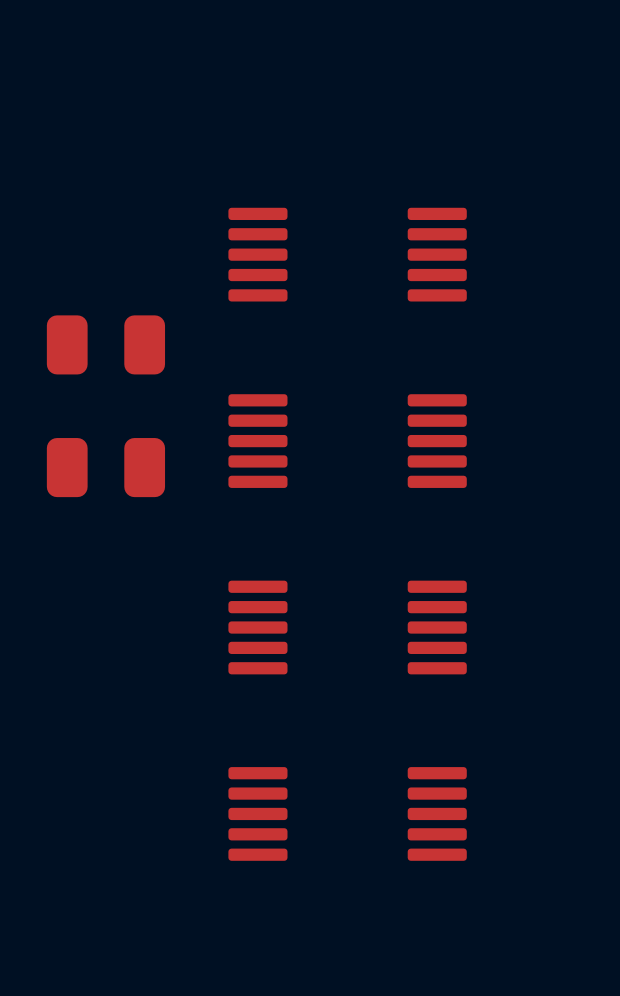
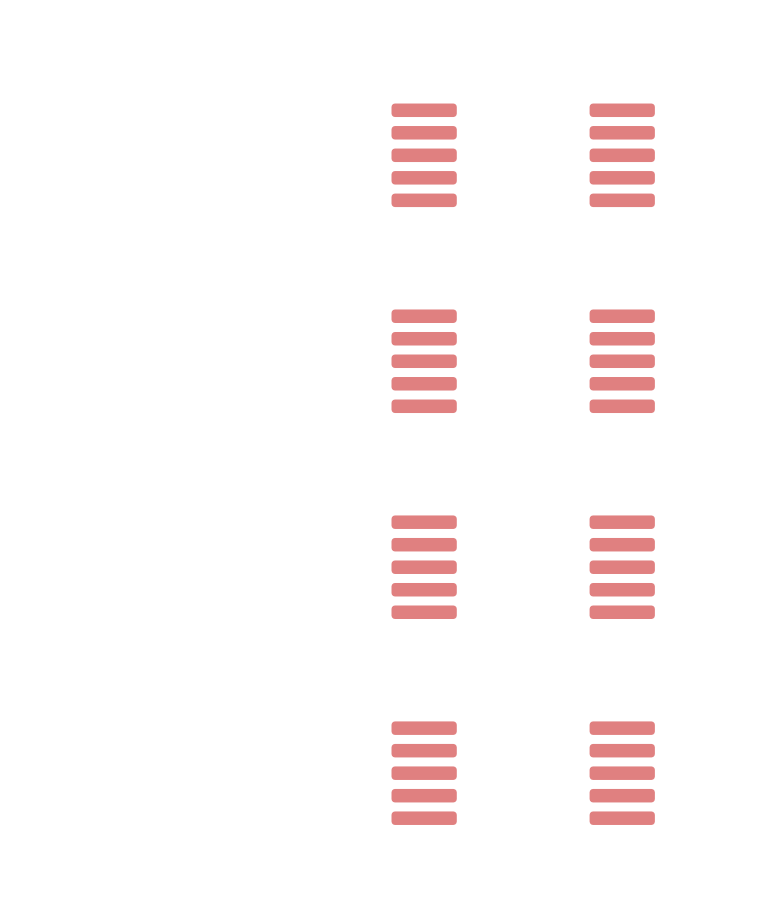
part: (105, 344) -> none
part: (105, 467) -> none

